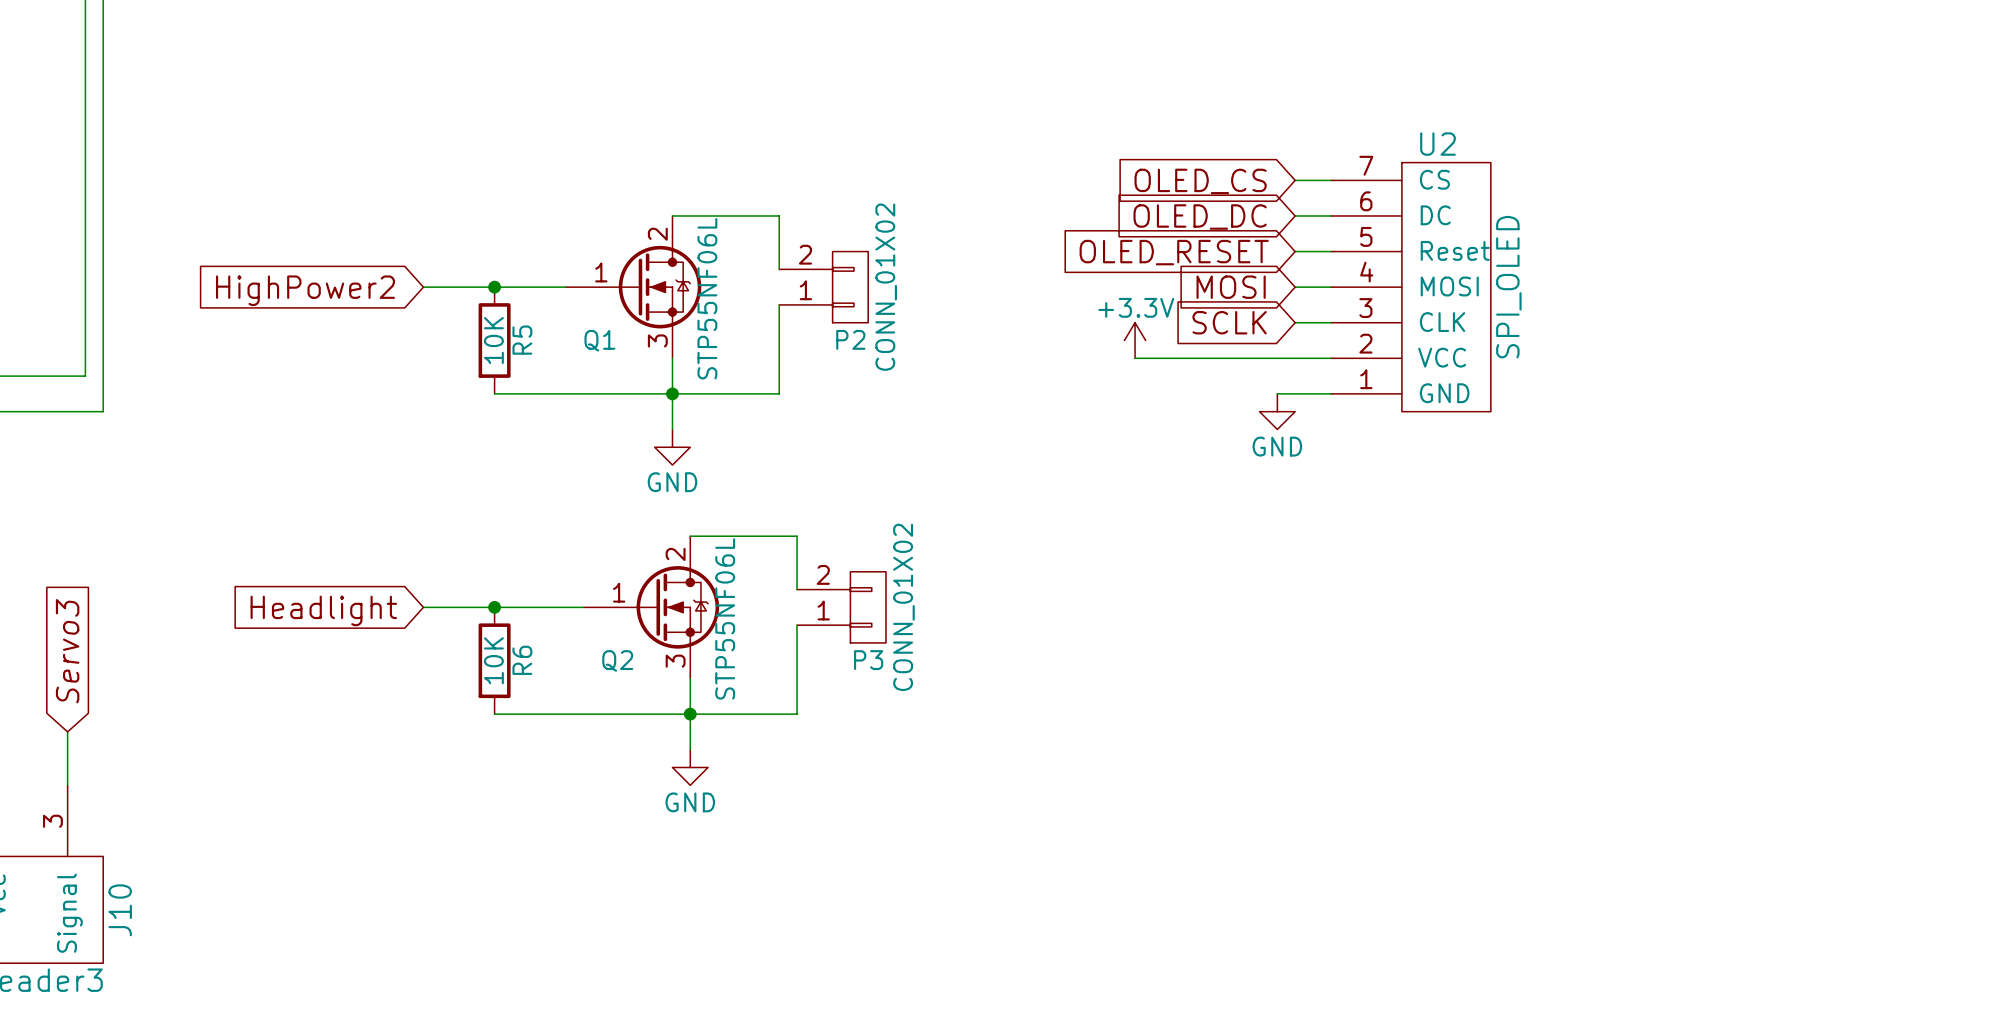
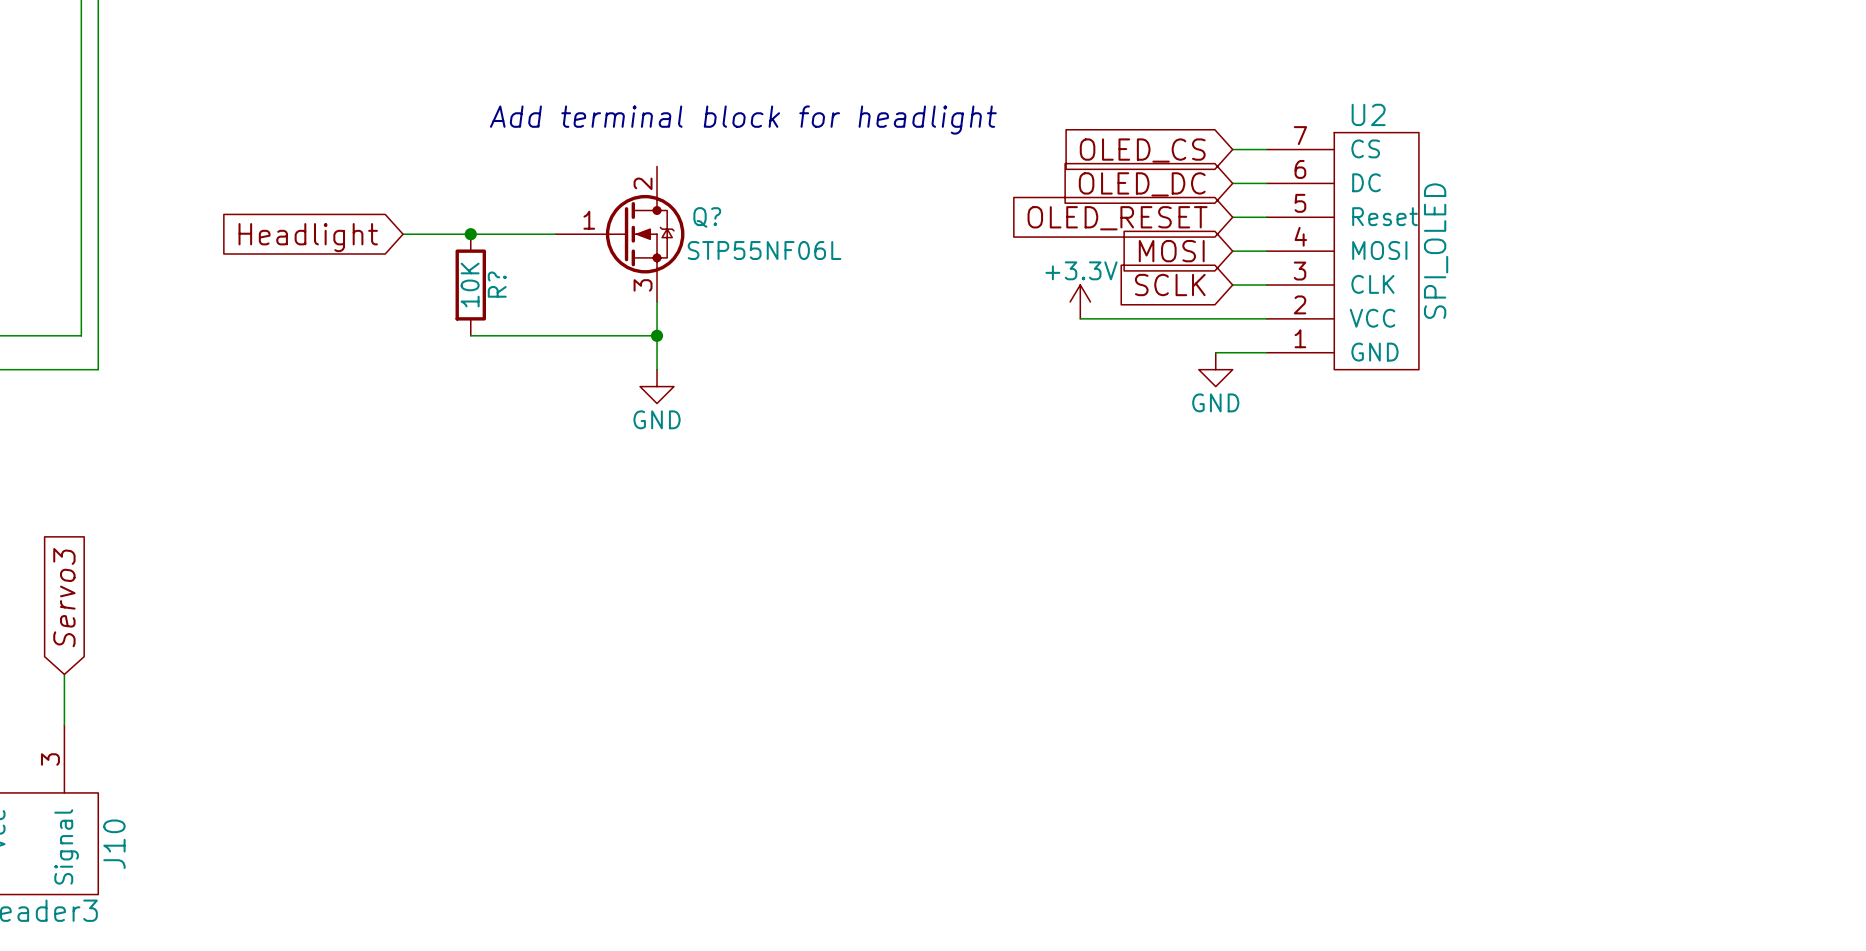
text: none -> Add terminal block for headlight (743, 120)
wire: (672, 215) (779, 215) (779, 269) -> none
Q?: none -> STP55NF06L (619, 234)
wire: (423, 287) (565, 287) -> none
junction position: (494, 287) -> (470, 234)
Q1: STP55NF06L (633, 287) -> none
P2: CONN_01X02 (823, 287) -> none
global label: HighPower2 (305, 290) -> none
wire: (779, 304) (779, 393) (494, 393) -> none
R?: none -> 10K (470, 285)
R5: 10K (494, 340) -> none
wire: (672, 358) (672, 429) -> none
wire: none -> (470, 335) (657, 335)
junction position: (672, 393) -> (657, 335)
power symbol position: GND (672, 447) -> GND (657, 386)
wire: (690, 536) (797, 536) (797, 589) -> none
wire: (423, 607) (583, 607) -> (403, 234) (555, 234)
junction: (494, 607) -> none
Q2: STP55NF06L (651, 607) -> none
P3: CONN_01X02 (841, 607) -> none
global label position: Headlight (323, 610) -> Headlight (308, 237)
wire: (797, 625) (797, 714) (494, 714) -> none
R6: 10K (494, 660) -> none
wire: (690, 678) (690, 749) -> (657, 301) (657, 369)
junction: (690, 714) -> none
power symbol: GND (690, 767) -> none

